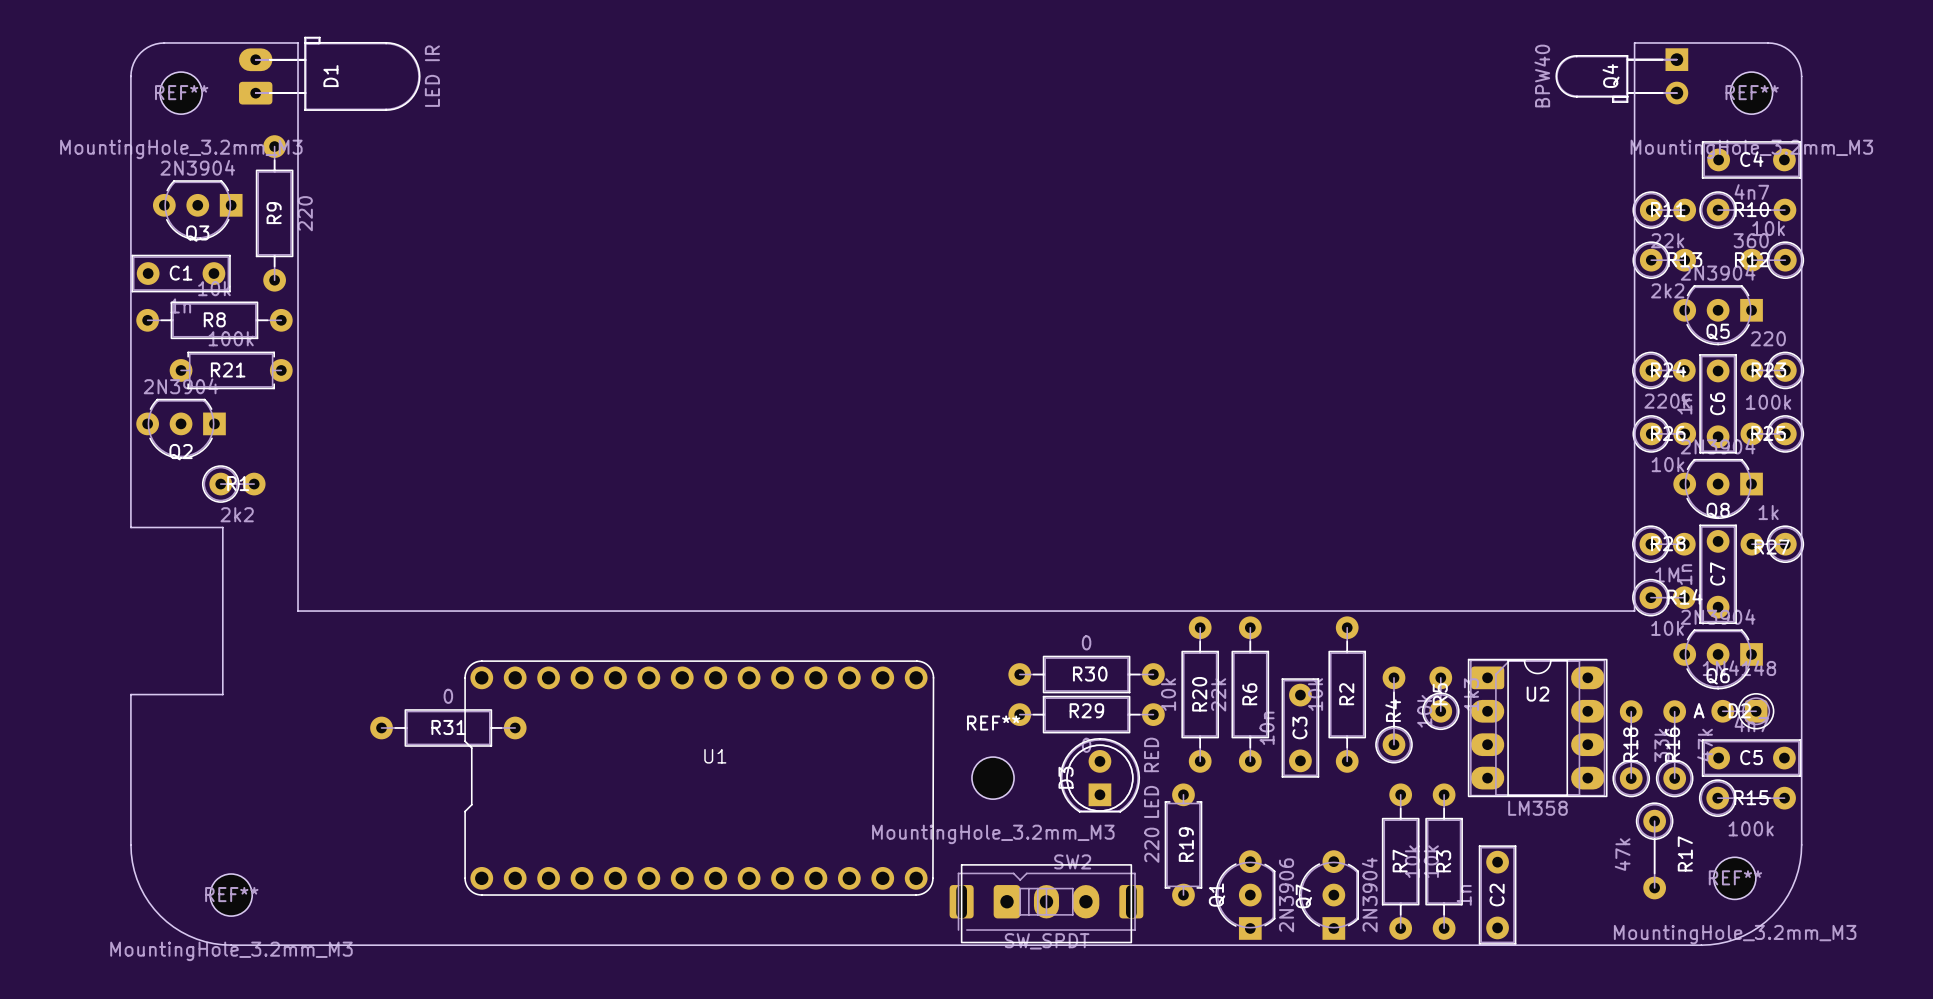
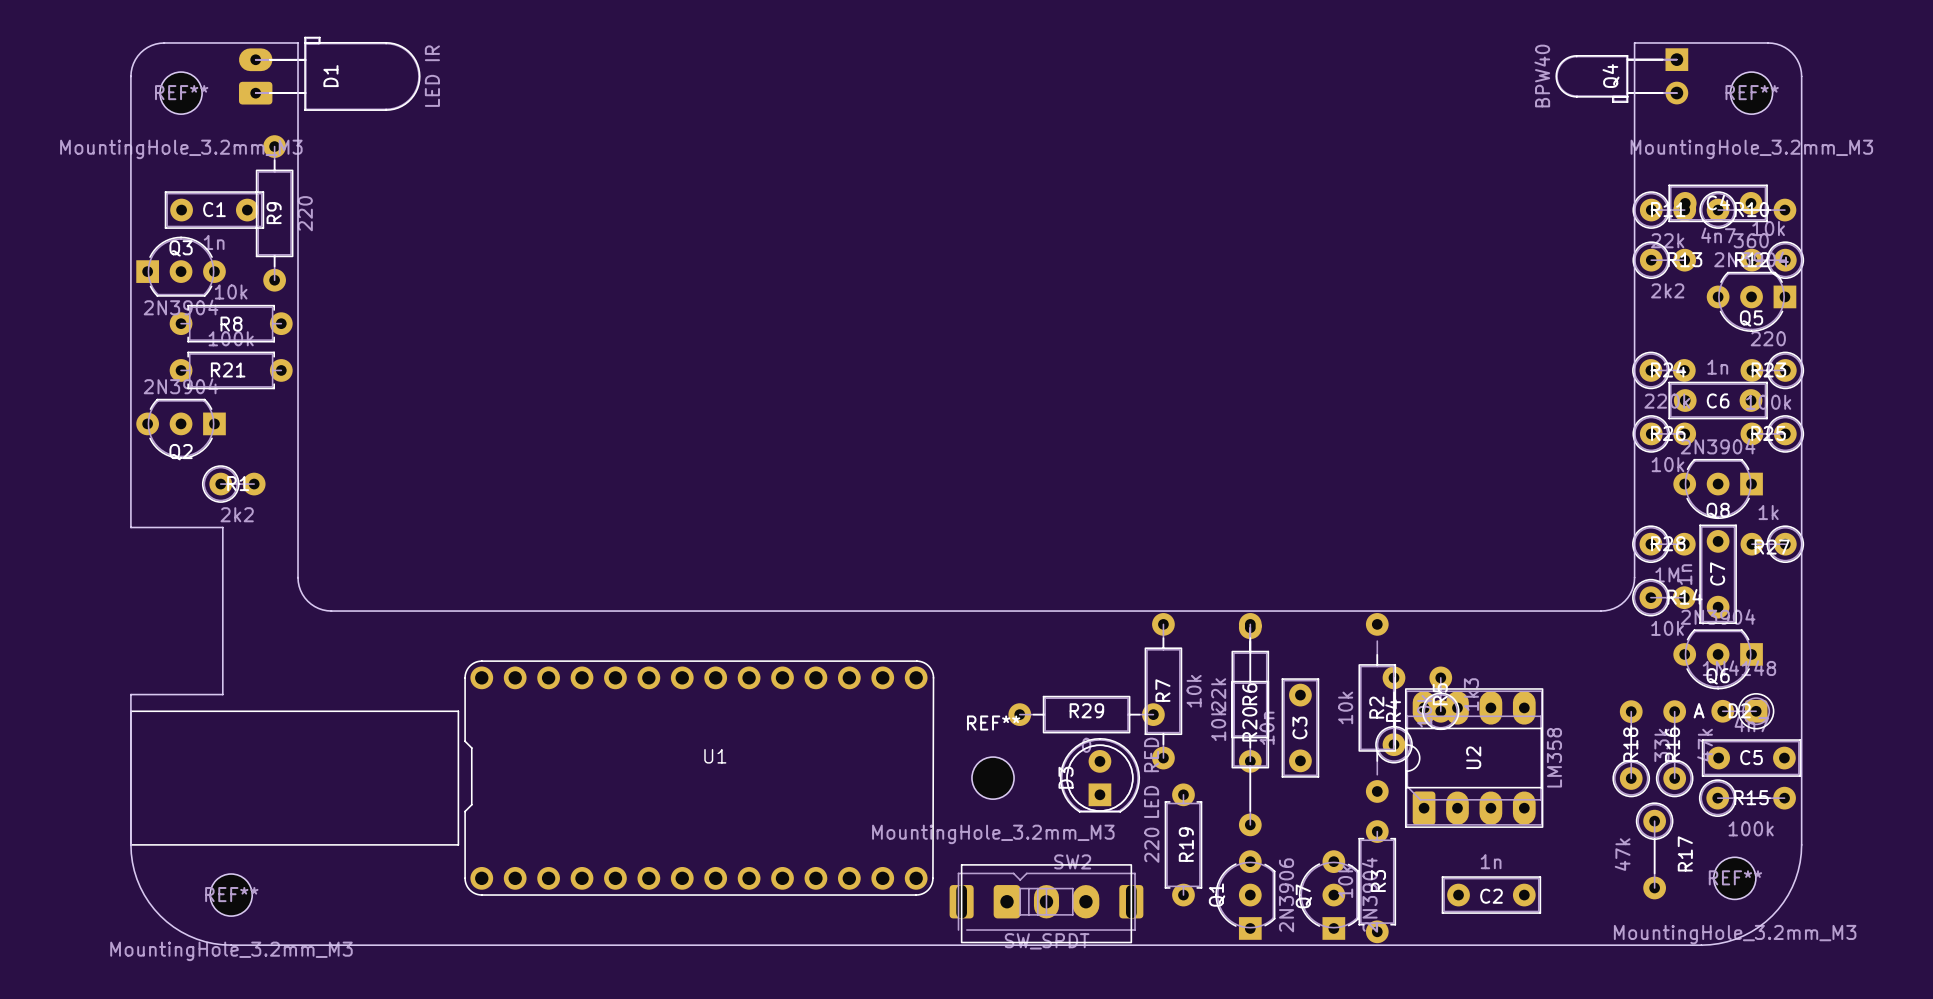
C4 position: (1751, 159) -> (1718, 203)
Q3 rotation: 0° (197, 210) -> 180° (181, 266)
Q3 position: (197, 210) -> (181, 266)
C1 position: (181, 273) -> (214, 210)
R8 footprint: [136, 301, 293, 340] -> [169, 304, 293, 343]
Q5 position: (1718, 315) -> (1751, 301)
C6 rotation: 0° (1718, 403) -> 90° clockwise (1718, 400)
board edge: (298, 577) (298, 611) (331, 611) -> (298, 577) (300, 590) (307, 601) (318, 608) (331, 611)
board edge: (1634, 577) (1634, 611) (1601, 611) -> (1634, 577) (1632, 590) (1624, 601) (1613, 608) (1601, 611)
R20 footprint: [1181, 616, 1220, 773] -> [1231, 613, 1270, 837]
R2 footprint: [1328, 616, 1367, 773] -> [1358, 613, 1397, 803]
R30: 0 (1086, 674) -> none
U2 name position: U2 (1537, 694) -> U2 (1473, 757)
line: none -> (130, 711) (458, 711) (458, 844) (130, 844) (130, 711)
R31: 0 (448, 727) -> none
U2 rotation: 0° (1537, 727) -> 90° counterclockwise (1474, 758)
R3 footprint: [1425, 783, 1463, 940] -> [1358, 820, 1397, 944]
R7 position: (1400, 861) -> (1163, 691)
C2 rotation: 0° (1497, 895) -> 90° clockwise (1491, 895)

